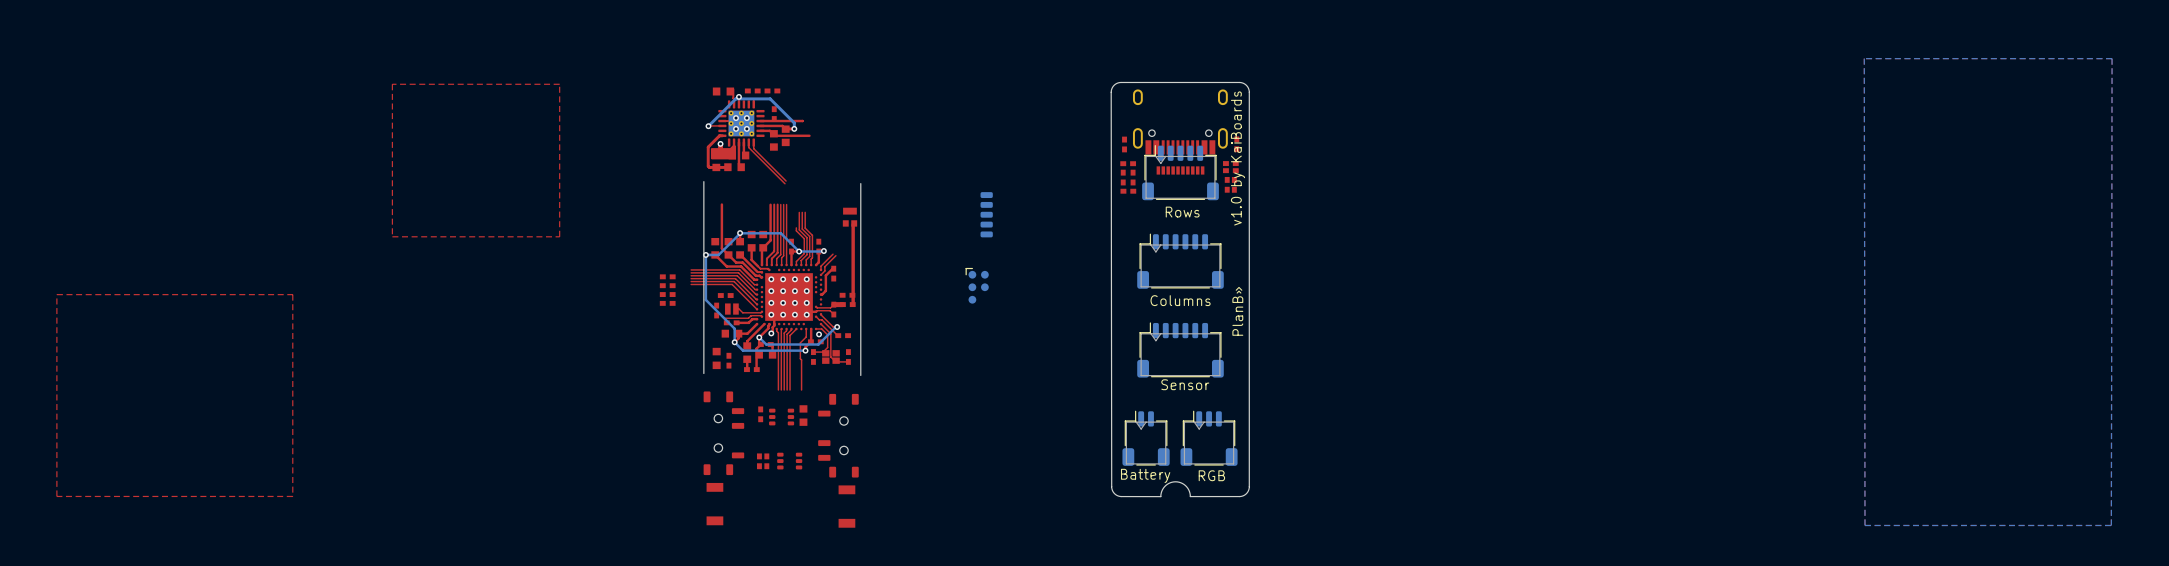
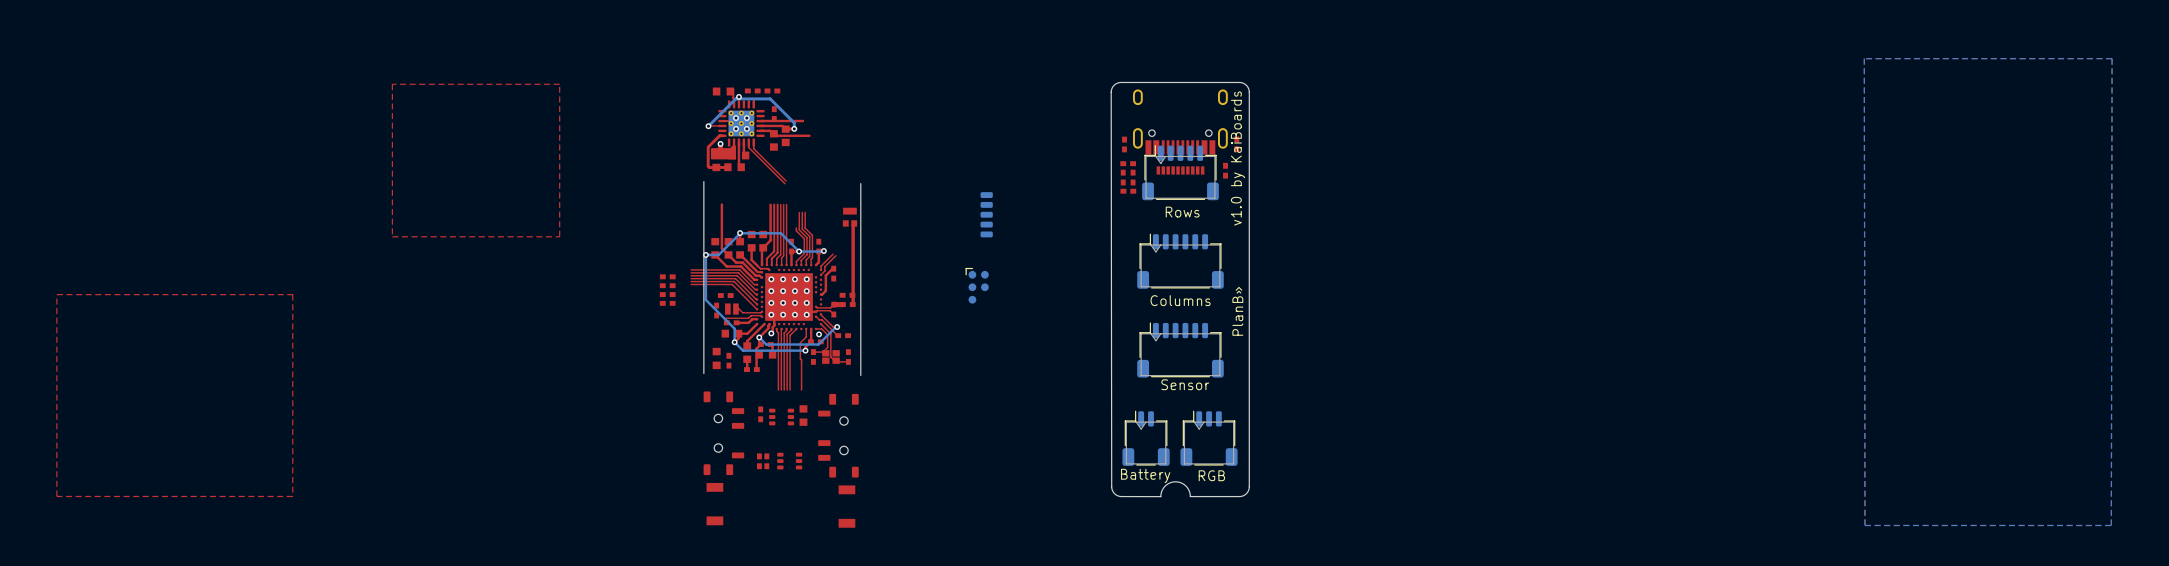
part: (1230, 163) -> none
part: none -> (1225, 170)
part: (1230, 170) -> none
part: (1227, 184) -> none
part: (1234, 184) -> none

